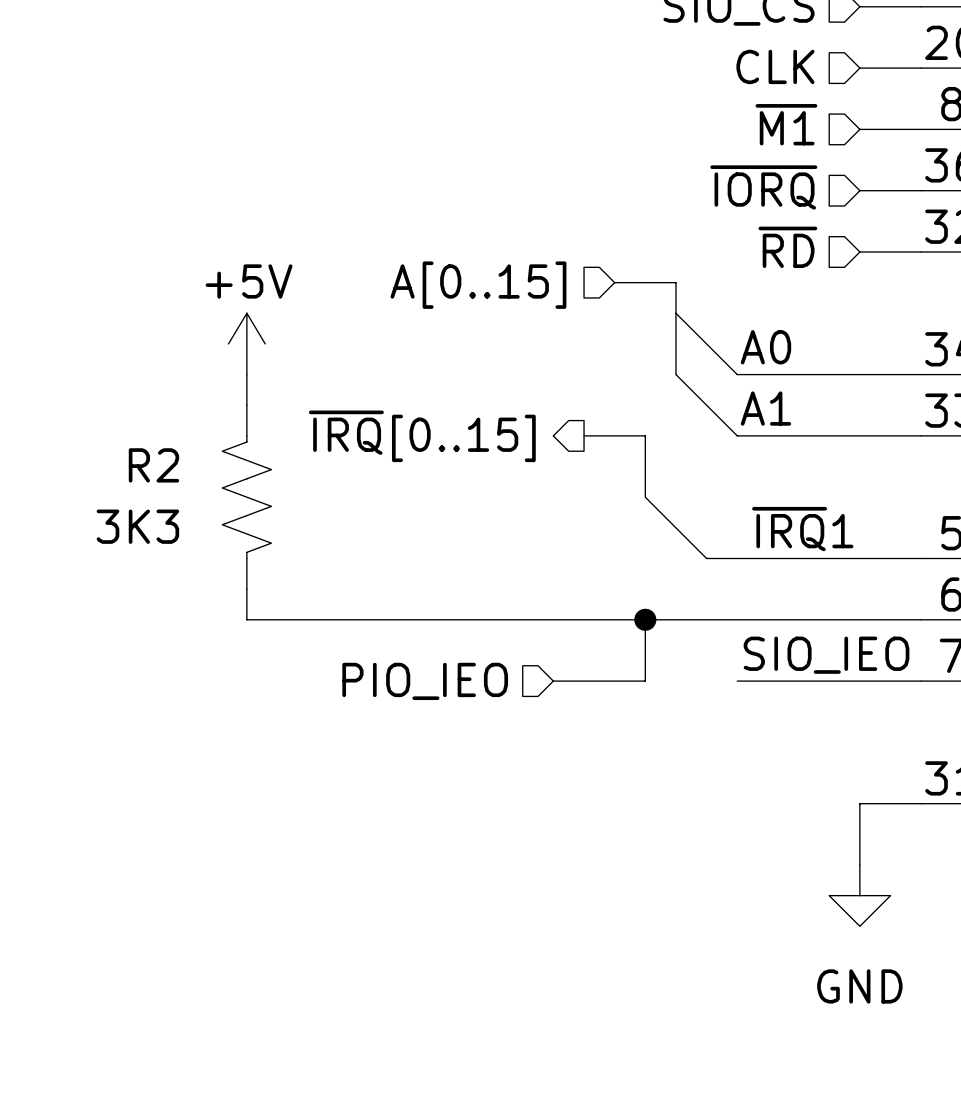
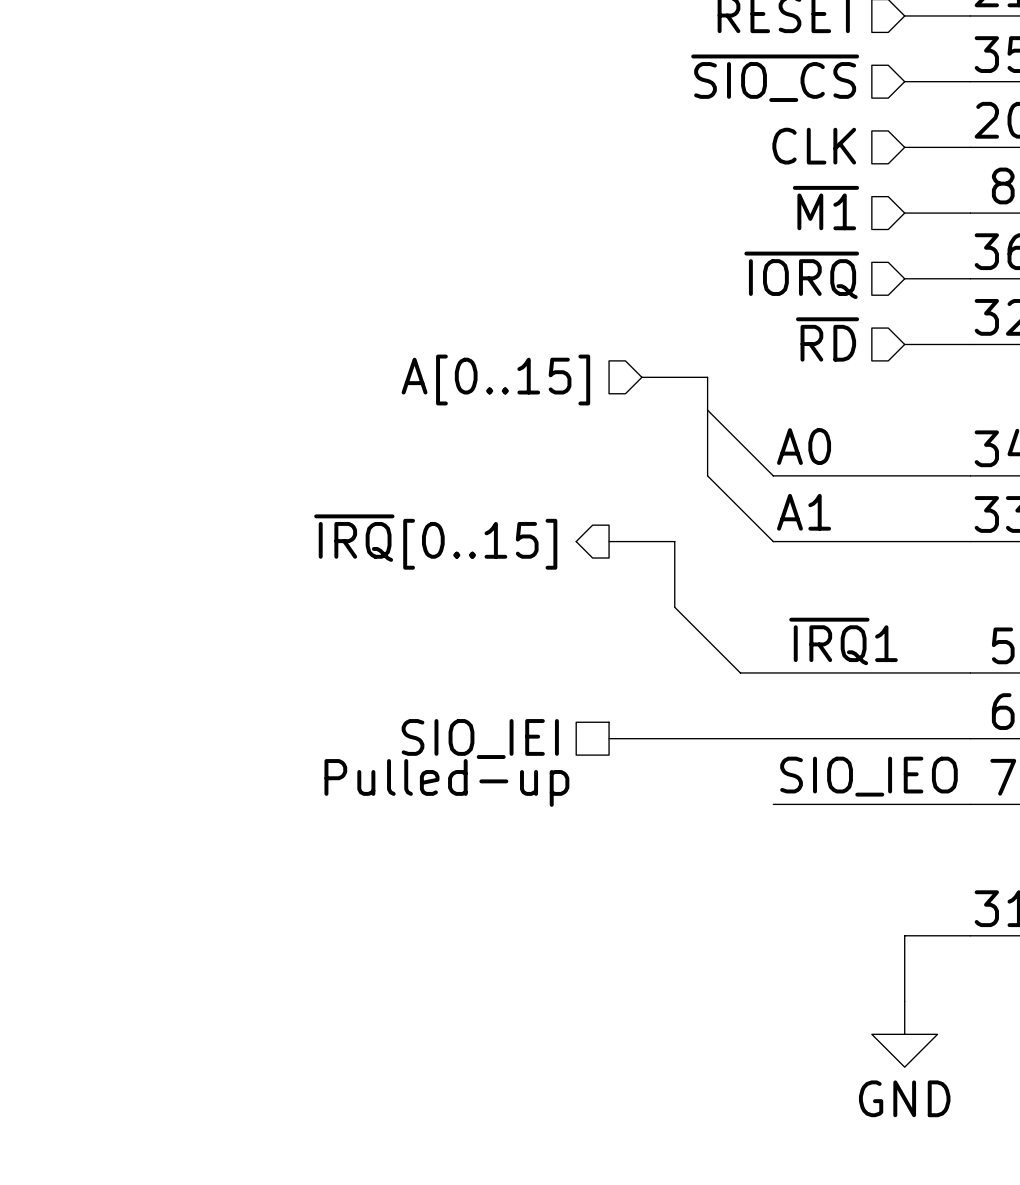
power symbol: +5V (246, 343) -> none
wire: (246, 374) (246, 405) -> none
R2: 3K3 (246, 497) -> none
wire: (246, 589) (246, 619) (584, 619) -> none
wire: (645, 619) (645, 681) (553, 681) -> none
junction: (645, 619) -> none
text: none -> Pulled-up (446, 782)
hierarchical label shape: input (425, 681) -> passive (480, 739)
hierarchical label: PIO_IEO (425, 681) -> SIO_IEI (480, 739)
power symbol text position: GND (859, 986) -> GND (904, 1098)

